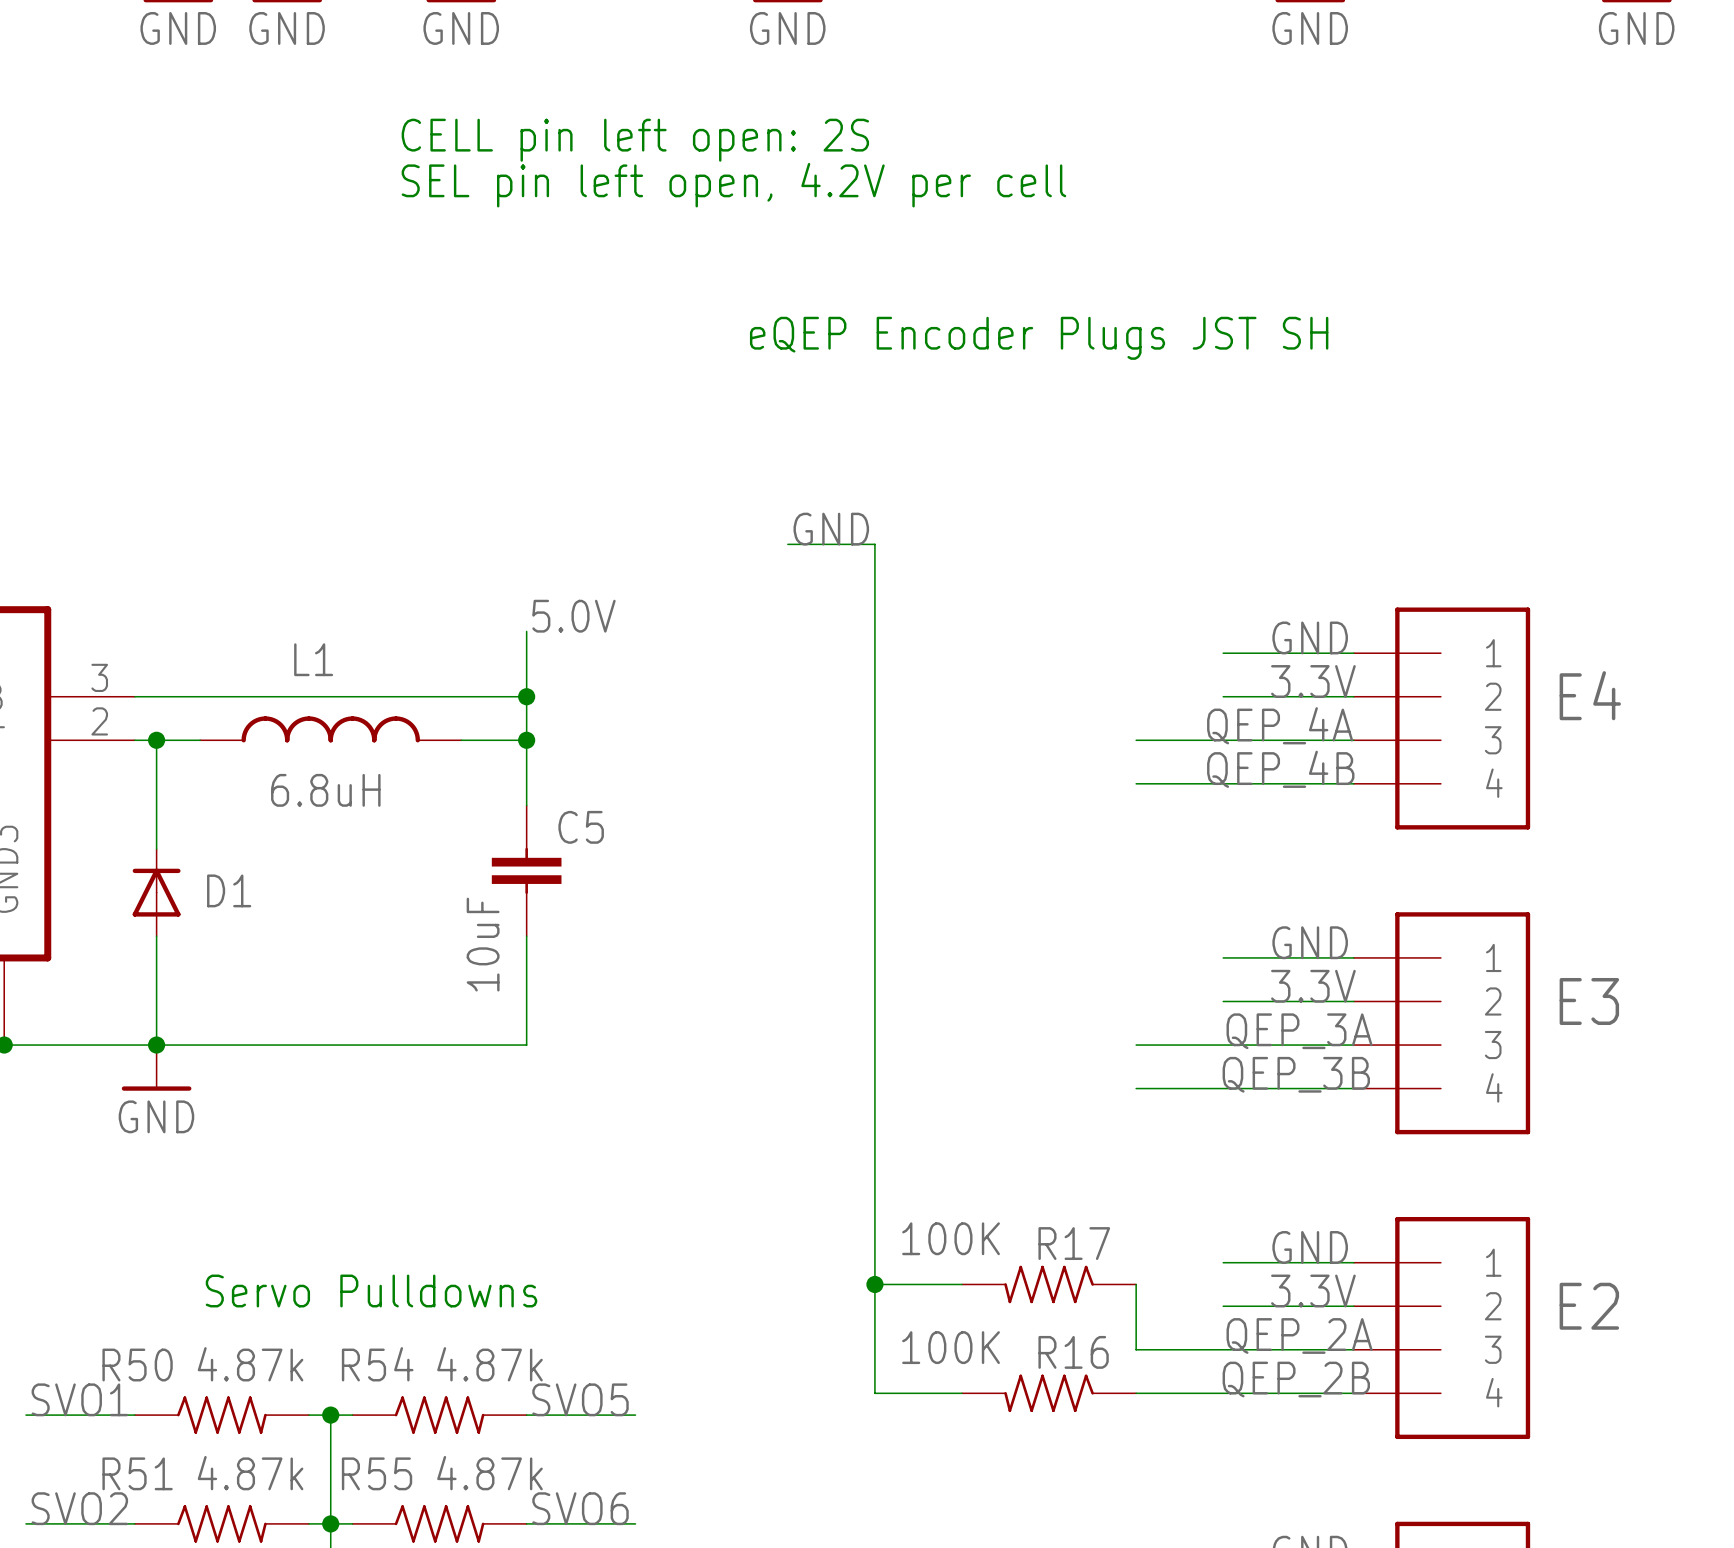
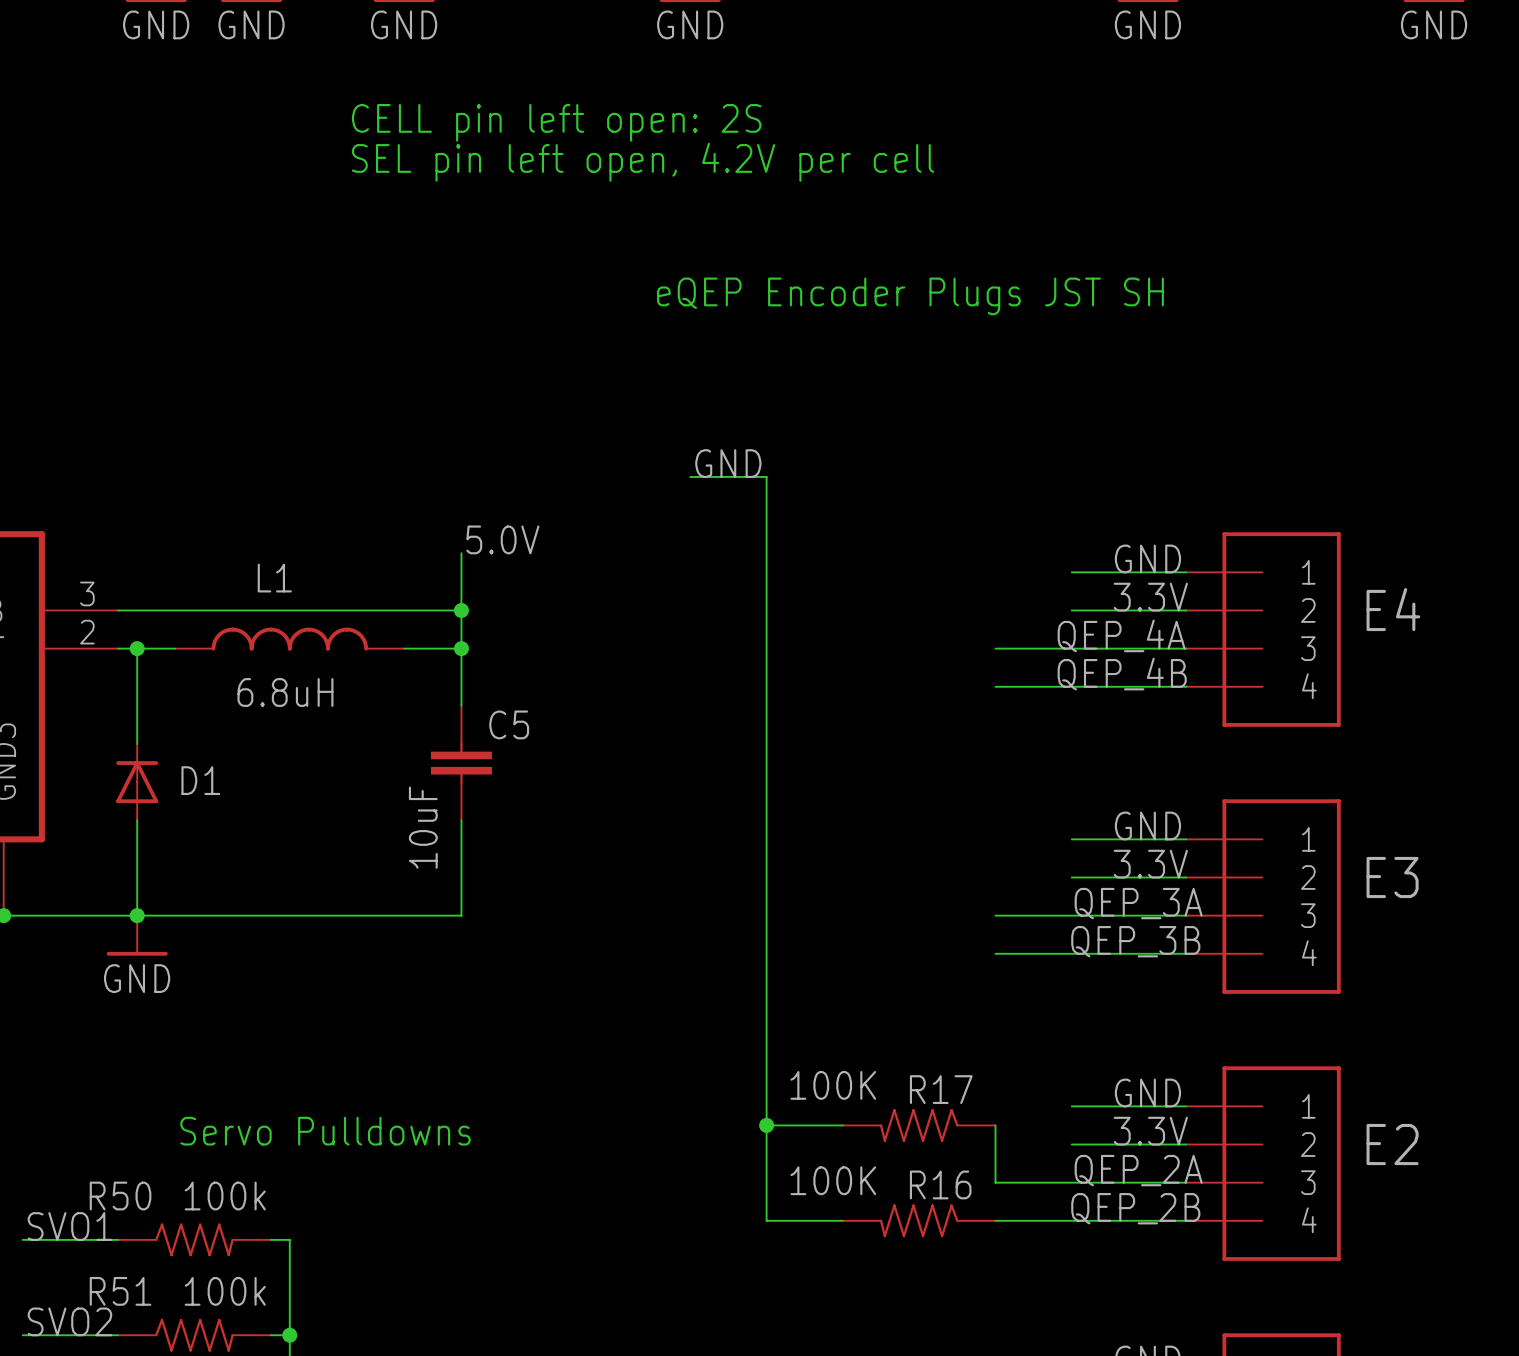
R50 value: 4.87k (250, 1364) -> 100k (225, 1196)
label: SVO5 (580, 1399) -> none
wire: (330, 1415) (352, 1415) -> none
junction: (330, 1415) -> none
R54: 4.87k (439, 1415) -> none
wire: (526, 1415) (635, 1415) -> none
R51 value: 4.87k (250, 1473) -> 100k (225, 1291)
label: SVO6 (580, 1508) -> none
wire: (330, 1523) (352, 1523) -> none
R55: 4.87k (439, 1523) -> none
wire: (526, 1523) (635, 1523) -> none

